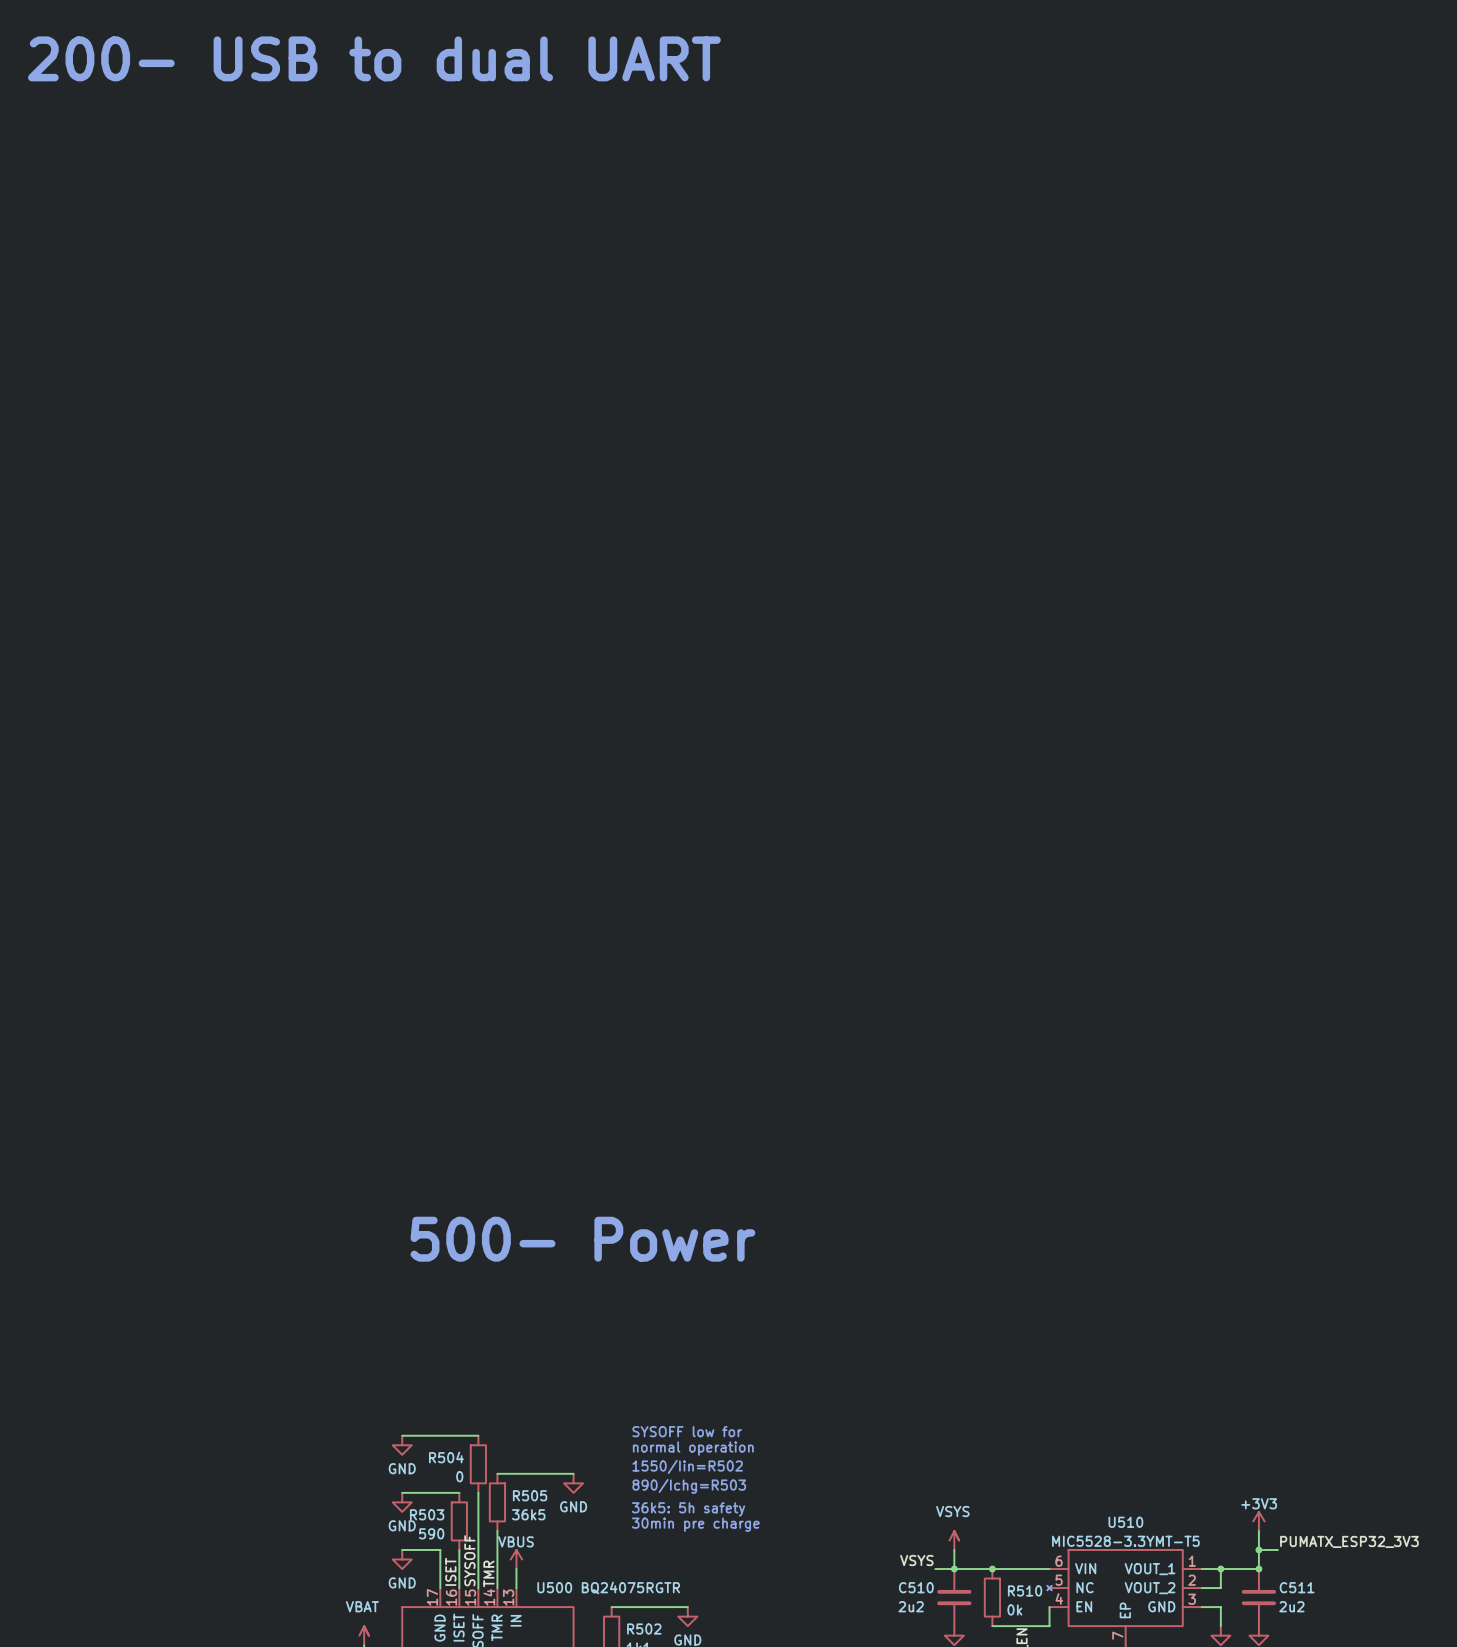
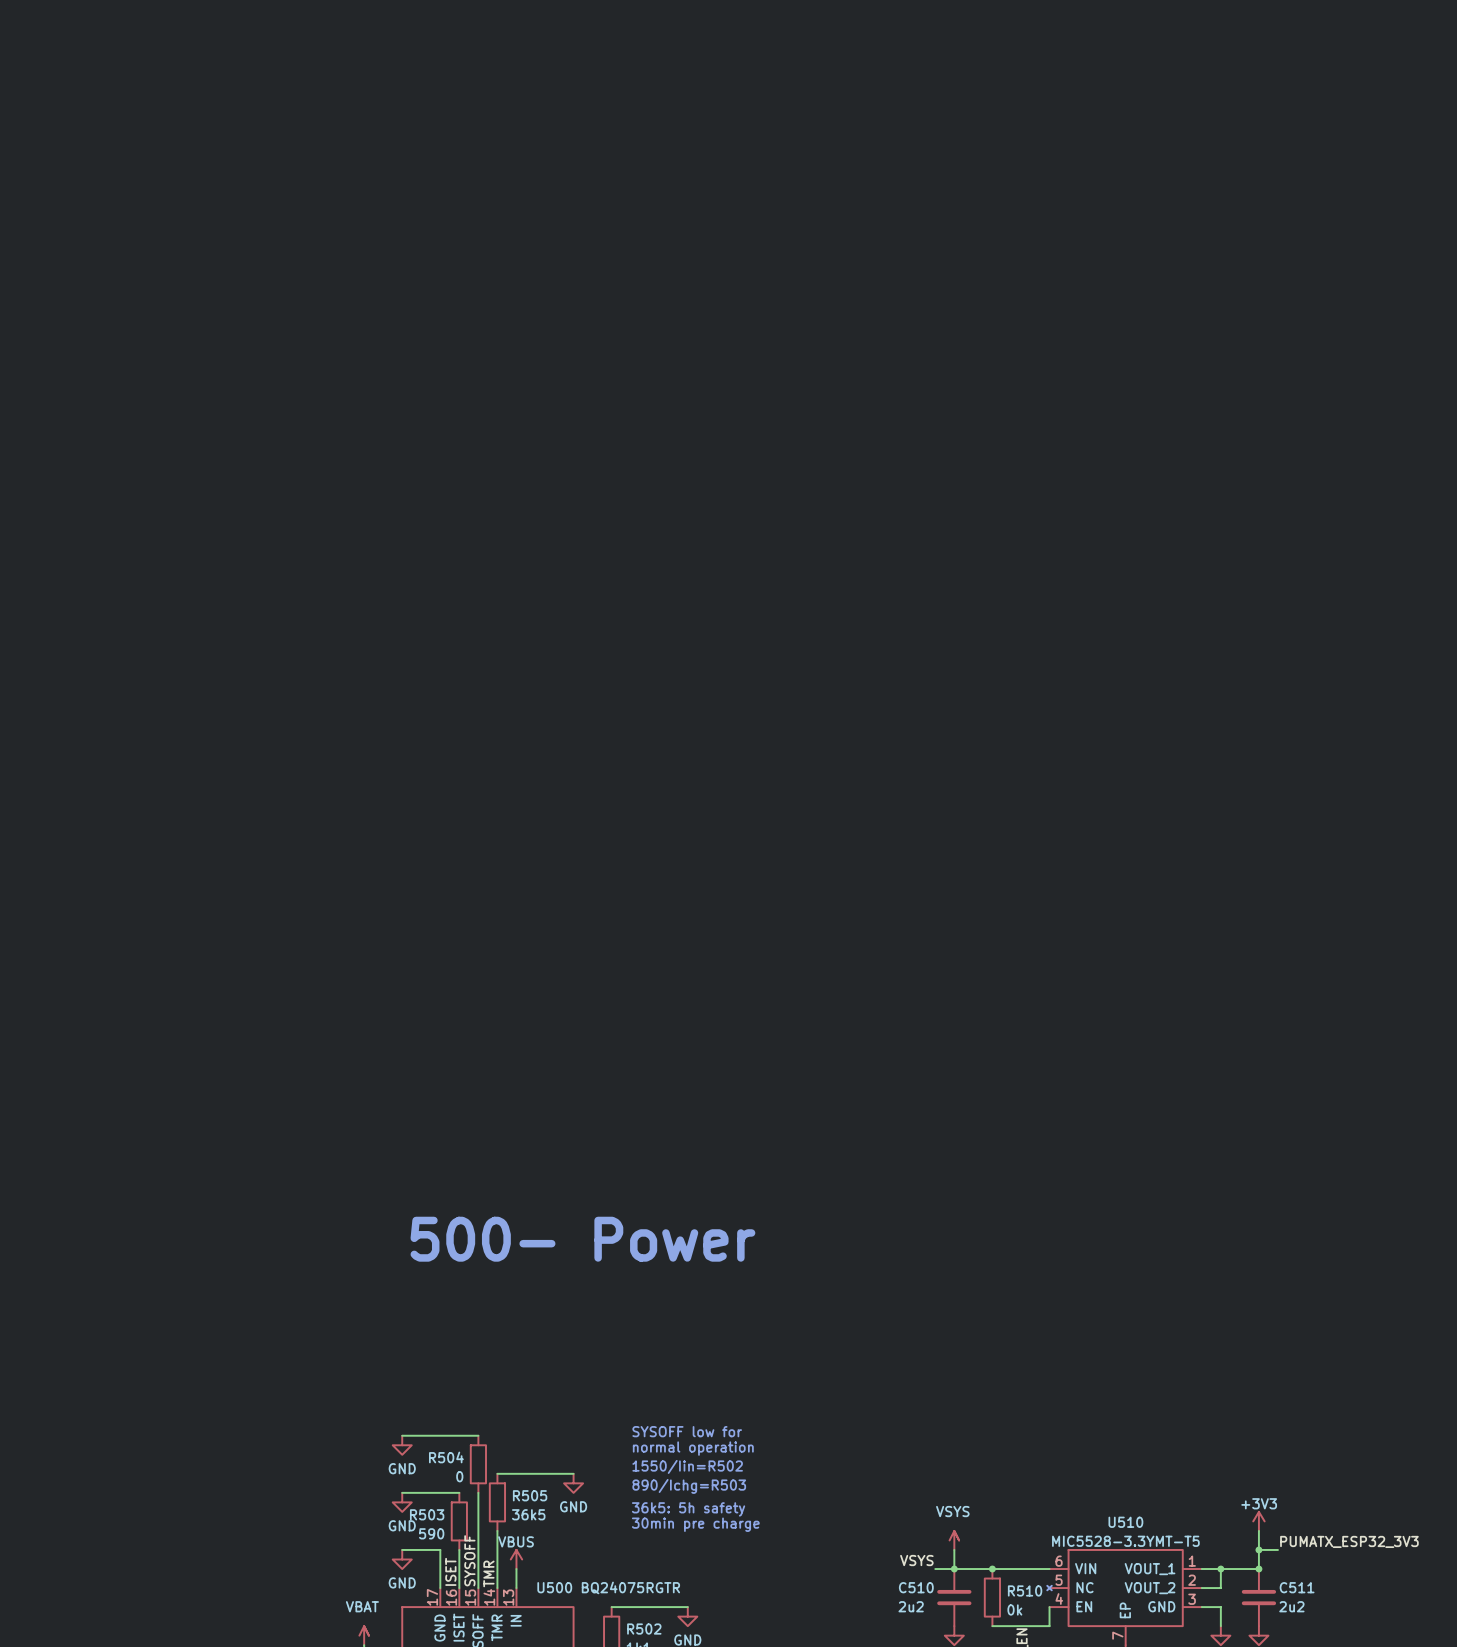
text: 200- USB to dual UART (374, 58) -> none

